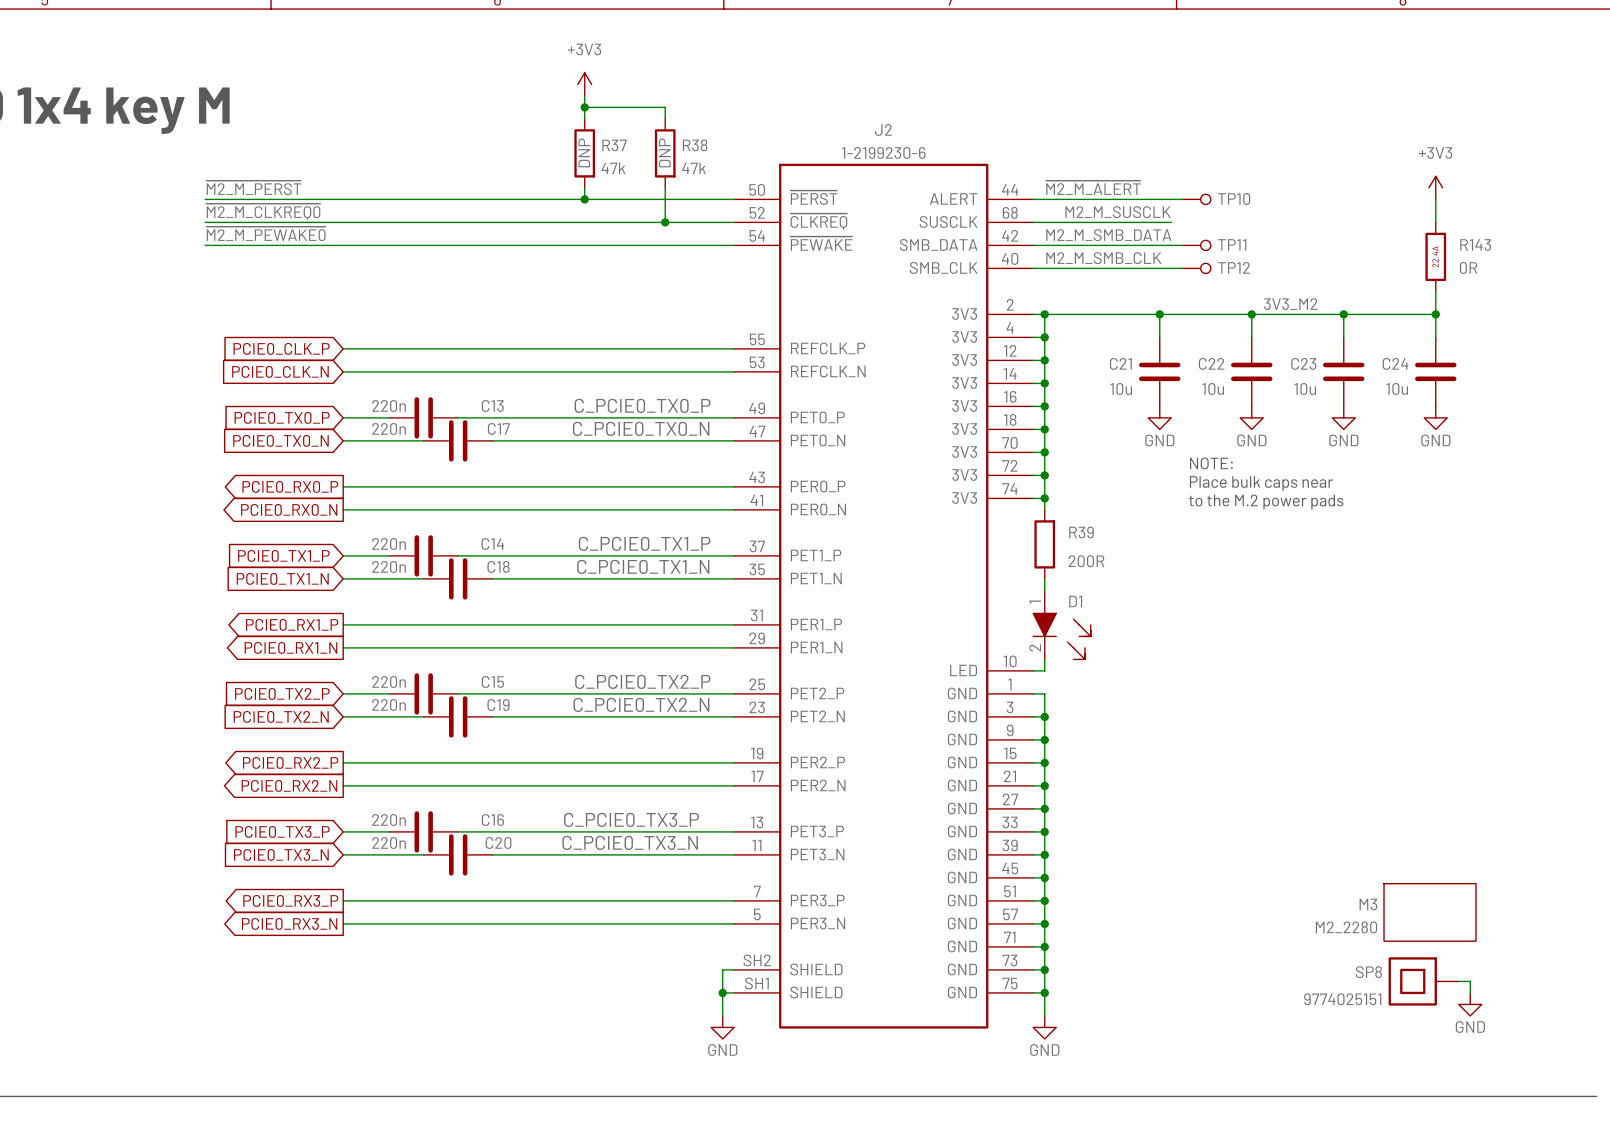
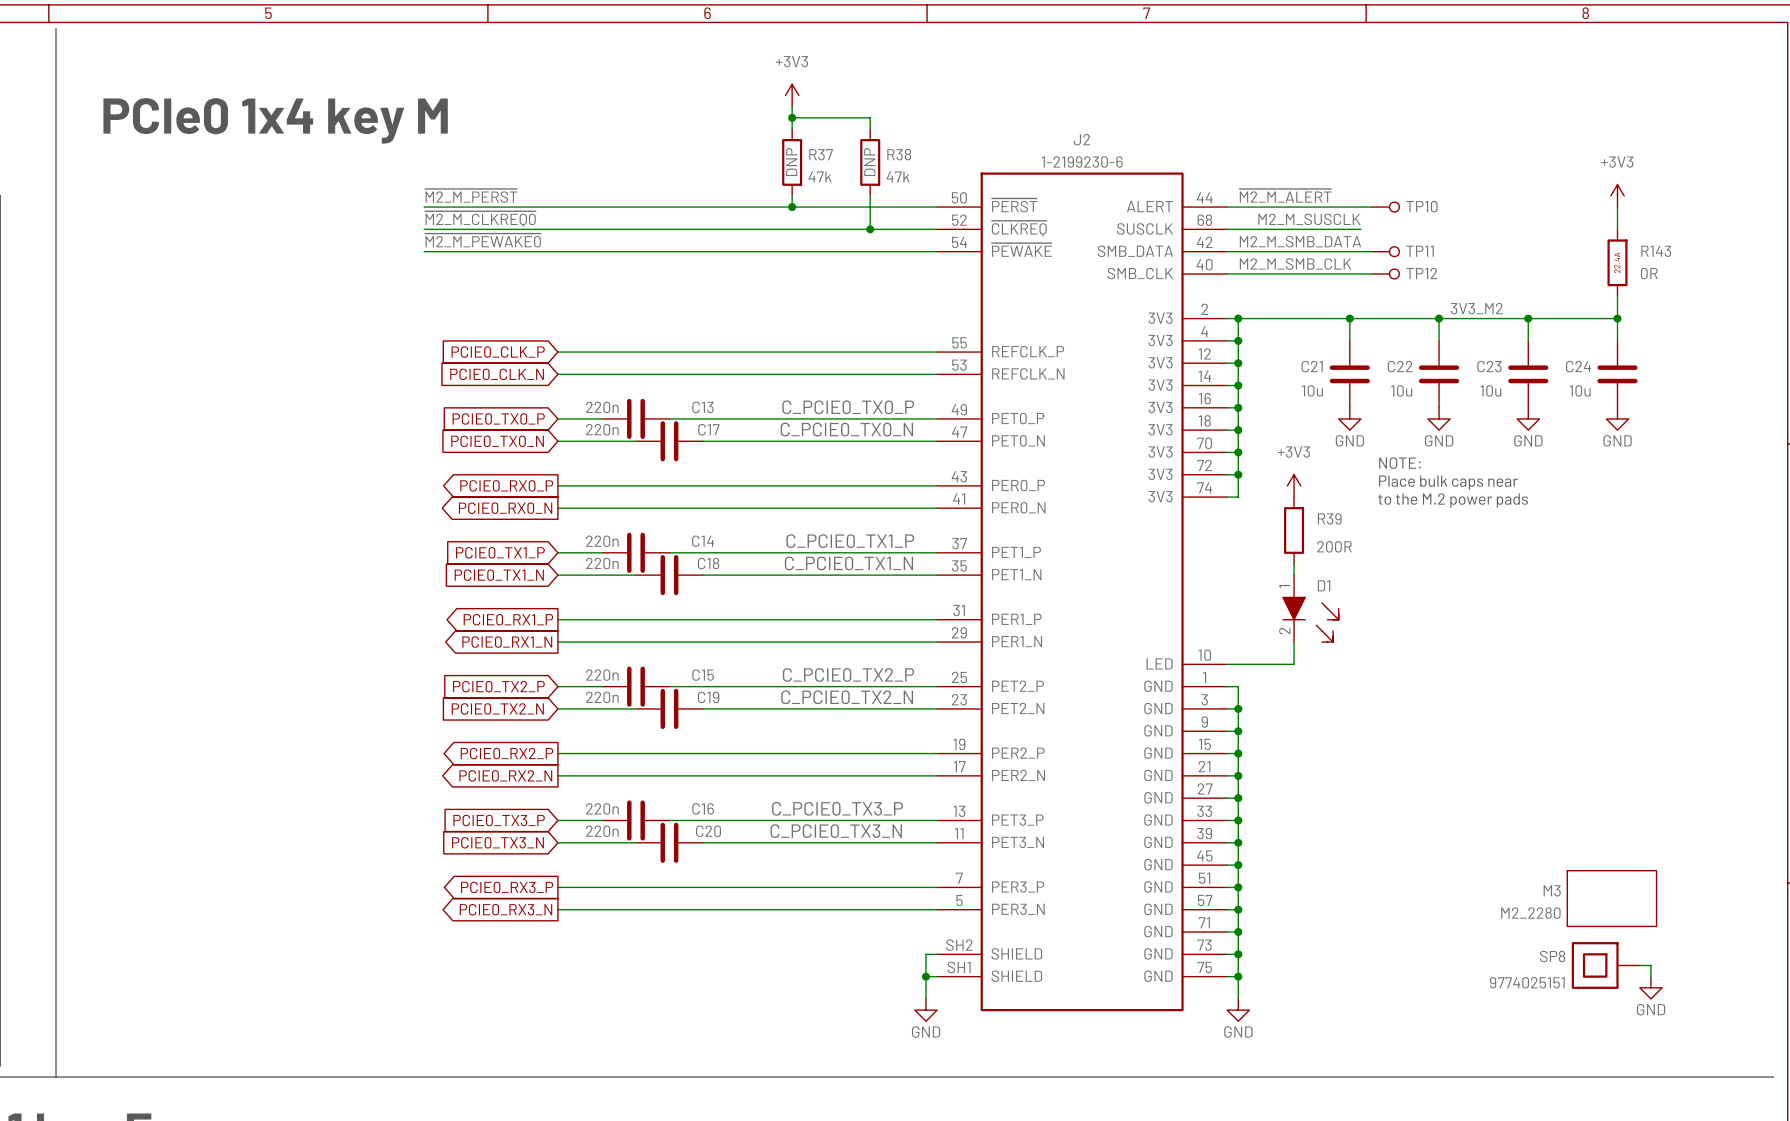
power symbol: none -> +3V3 (1294, 485)
wire: (1044, 498) (1044, 509) -> none
junction: (1044, 498) -> none
R39 position: (1044, 544) -> (1294, 530)
wire: (1044, 578) (1044, 590) -> (1294, 563) (1294, 575)
D1 position: (1061, 624) -> (1310, 608)
wire: (1044, 659) (1044, 670) -> (1294, 642) (1294, 664) (1238, 664)

